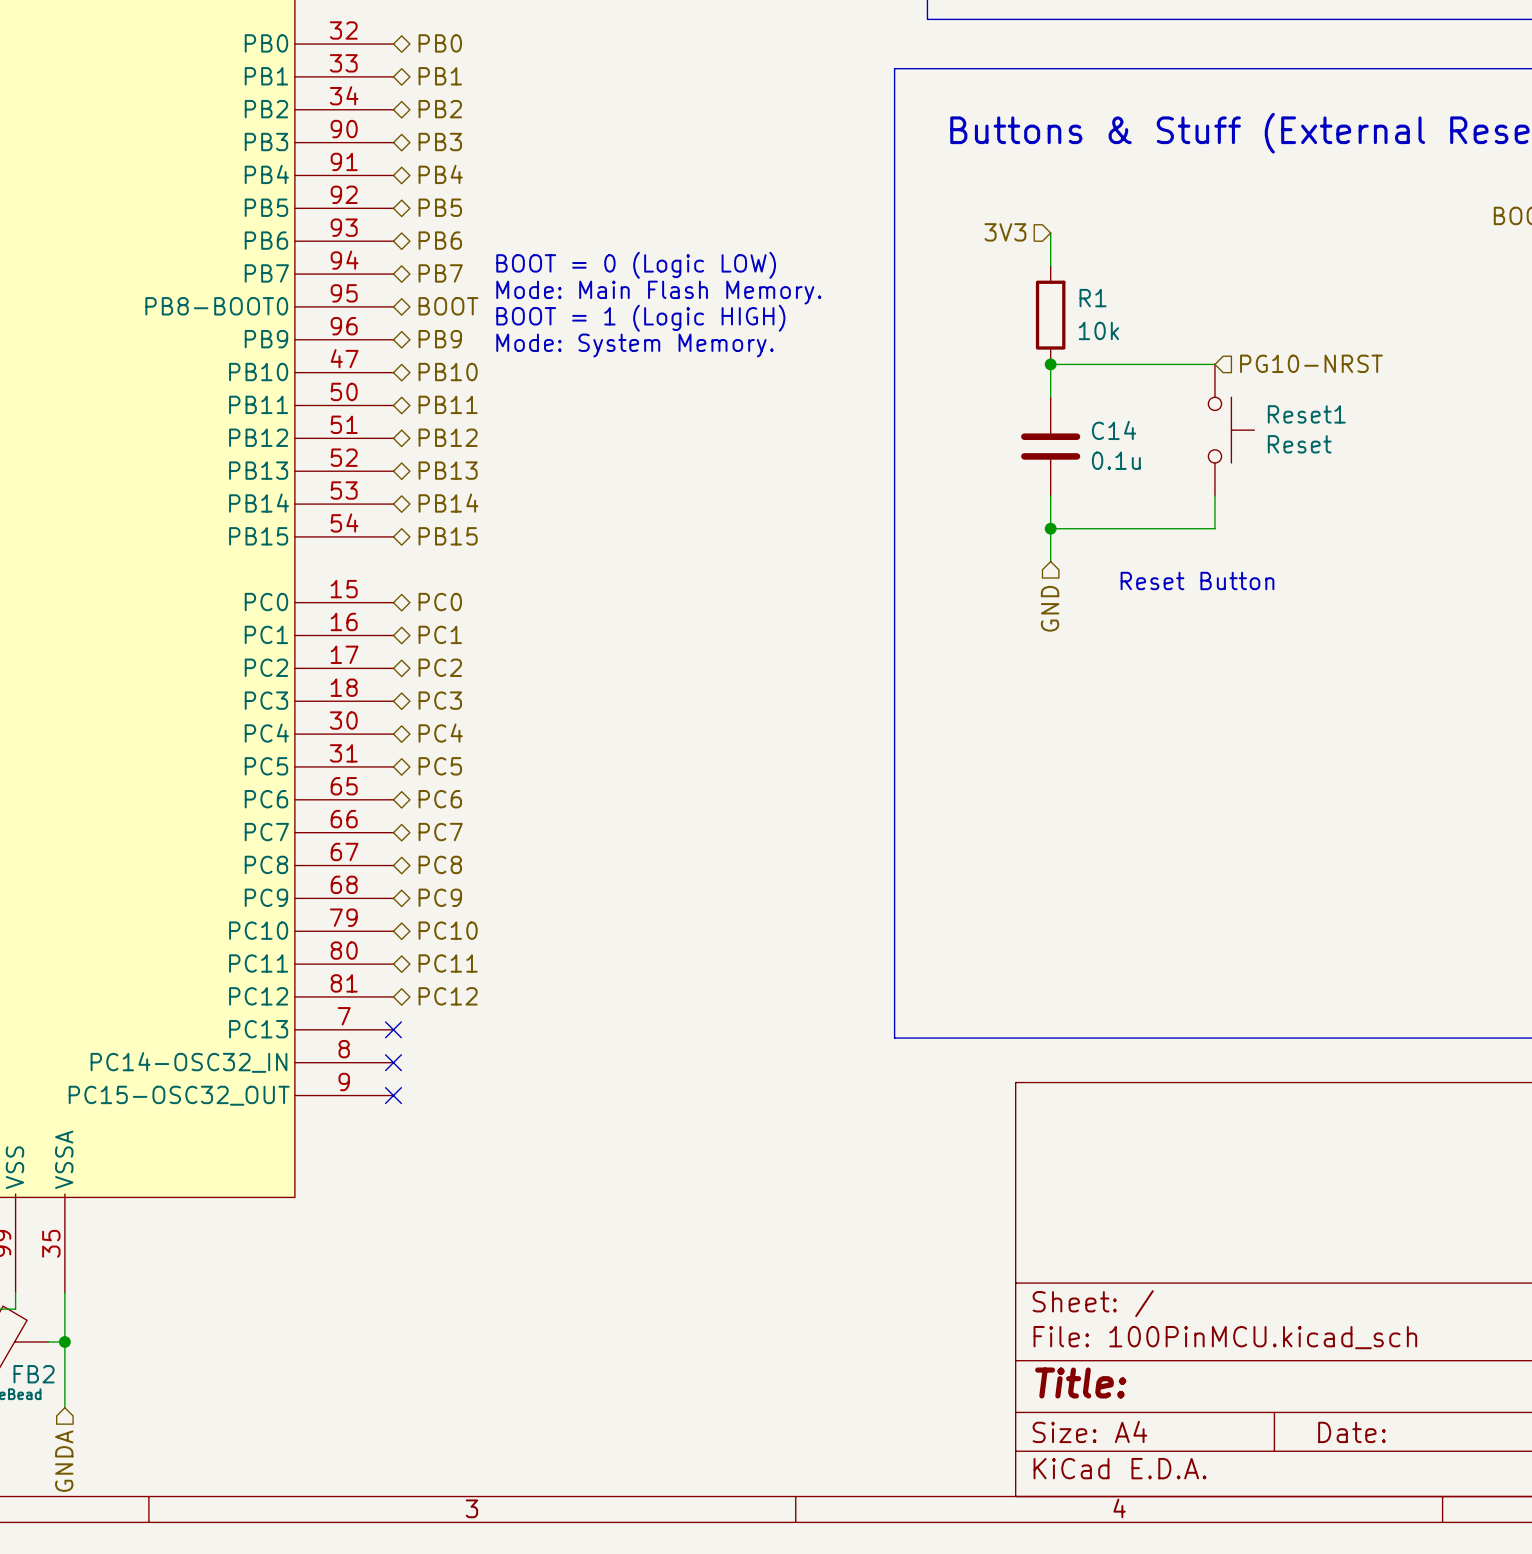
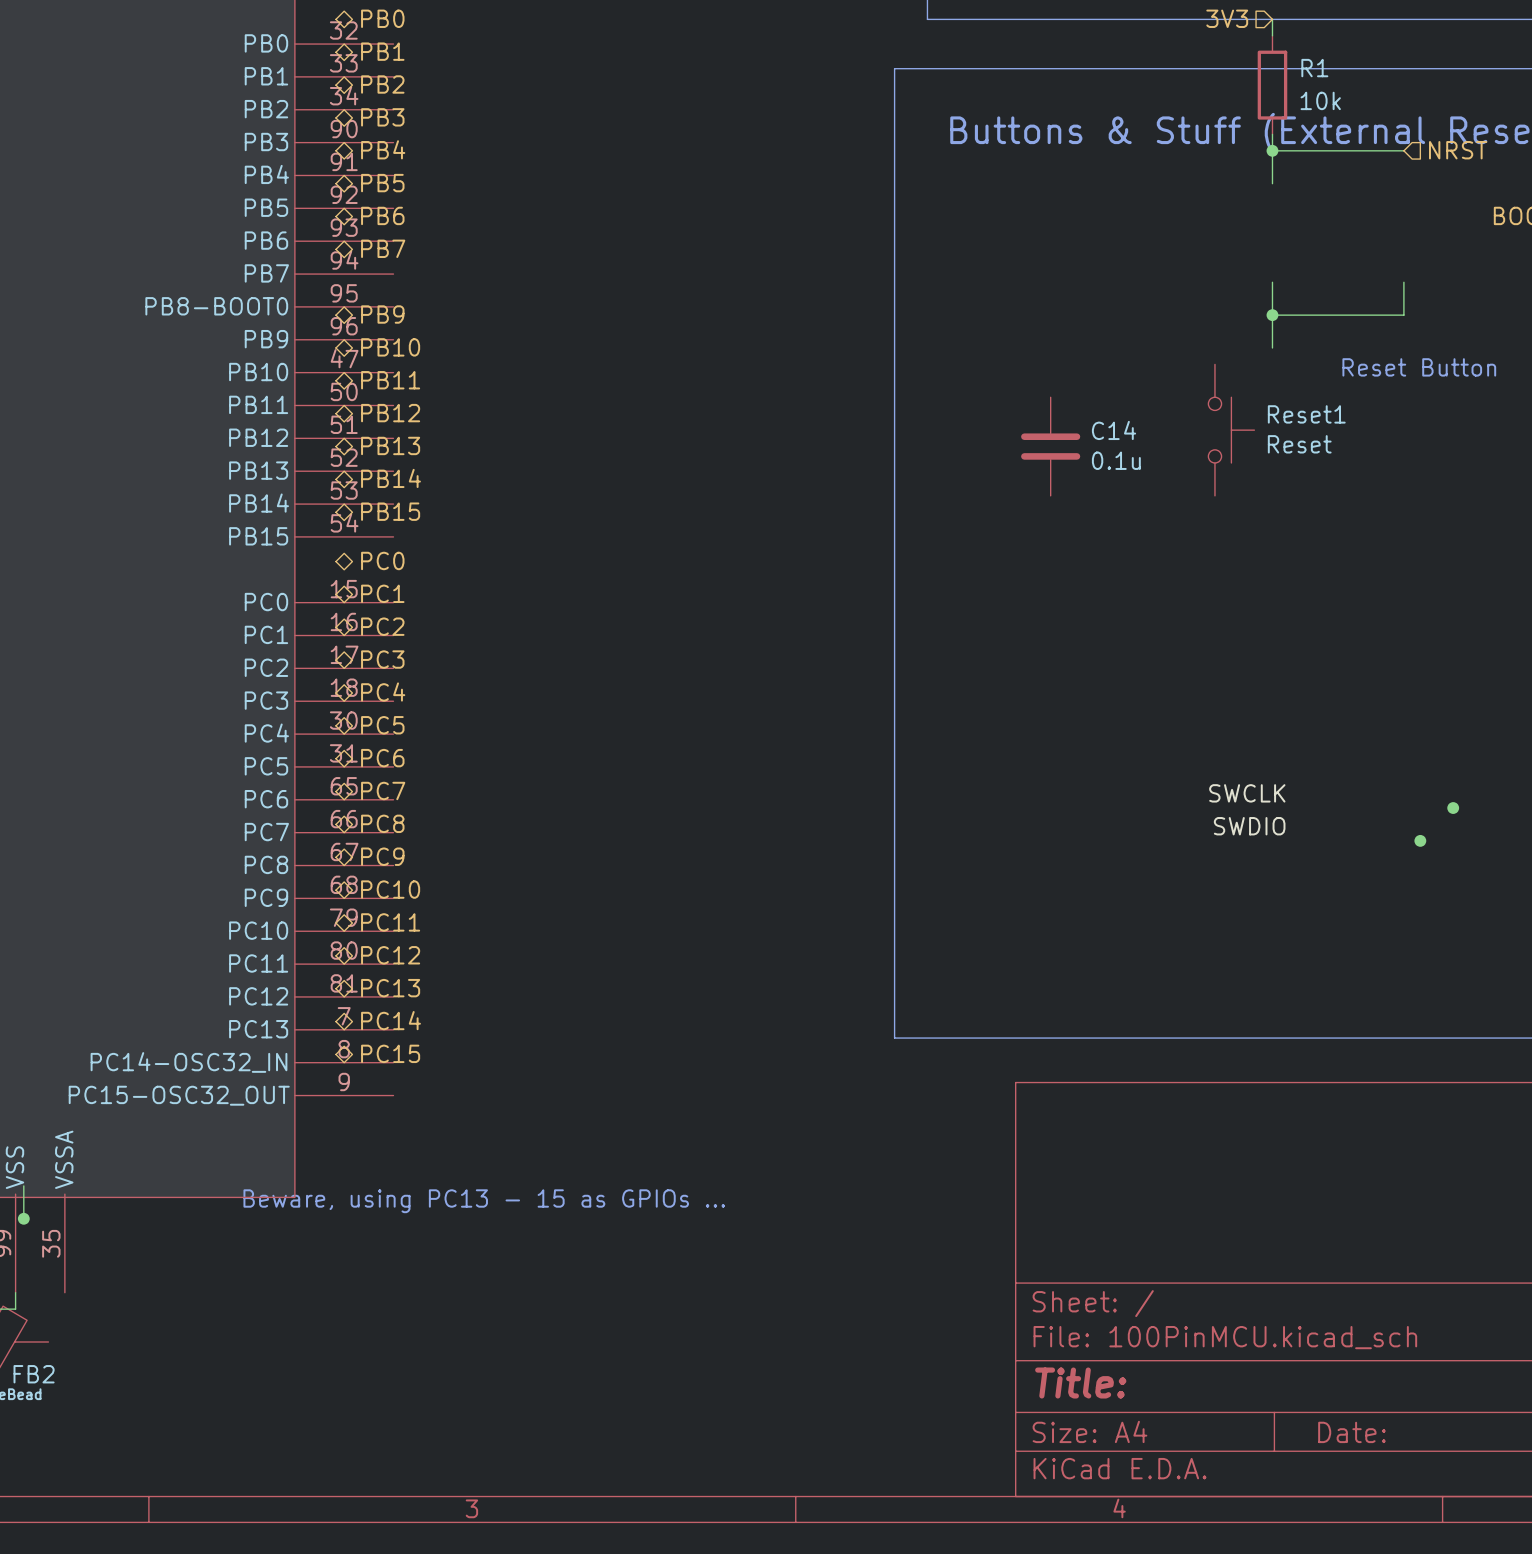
wire: none -> (1272, 19) (1272, 35)
hierarchical label position: PB0 (440, 43) -> PB0 (382, 18)
hierarchical label position: PB1 (440, 76) -> PB1 (382, 51)
hierarchical label position: PB2 (440, 109) -> PB2 (382, 84)
wire: none -> (1272, 134) (1272, 183)
hierarchical label position: PB3 (440, 142) -> PB3 (382, 117)
wire: none -> (1272, 150) (1403, 150)
junction: none -> (1272, 150)
hierarchical label: none -> NRST (1458, 150)
hierarchical label position: PB4 (440, 174) -> PB4 (383, 149)
hierarchical label position: PB5 (440, 207) -> PB5 (382, 183)
hierarchical label position: 3V3 (1005, 232) -> 3V3 (1227, 18)
wire: (1050, 232) (1050, 265) -> none
hierarchical label position: PB6 (440, 240) -> PB6 (382, 215)
text: BOOT = 0 (Logic LOW) (636, 265) -> none
hierarchical label position: PB7 (440, 273) -> PB7 (383, 248)
wire: none -> (1403, 282) (1403, 315) (1272, 315)
text: Mode: Main Flash Memory. (658, 292) -> none
hierarchical label: BOOT (448, 306) -> none
R1 position: (1050, 315) -> (1272, 85)
junction: none -> (1272, 315)
text: BOOT = 1 (Logic HIGH) (640, 318) -> none
hierarchical label position: PB9 (440, 339) -> PB9 (382, 314)
text: Mode: System Memory. (634, 345) -> none
hierarchical label: PG10-NRST (1311, 363) -> none
junction: (1050, 364) -> none
wire: (1214, 364) (1050, 364) (1050, 397) -> none
hierarchical label position: PB10 (448, 372) -> PB10 (390, 347)
hierarchical label position: PB11 (448, 404) -> PB11 (390, 380)
hierarchical label position: PB12 (448, 437) -> PB12 (390, 413)
hierarchical label position: PB13 (448, 470) -> PB13 (390, 445)
wire: (1050, 495) (1050, 561) -> (1272, 282) (1272, 347)
wire: (1214, 495) (1214, 528) (1050, 528) -> none
hierarchical label position: PB14 (448, 503) -> PB14 (390, 478)
junction: (1050, 528) -> none
hierarchical label position: PB15 (448, 536) -> PB15 (390, 511)
text position: Reset Button (1197, 580) -> Reset Button (1419, 367)
hierarchical label position: PC0 (440, 602) -> PC0 (382, 560)
hierarchical label: GND (1050, 608) -> none
hierarchical label position: PC1 (440, 634) -> PC1 (382, 593)
hierarchical label position: PC2 (440, 667) -> PC2 (382, 626)
hierarchical label position: PC3 (440, 700) -> PC3 (382, 659)
hierarchical label position: PC4 (440, 733) -> PC4 (383, 692)
hierarchical label position: PC5 (440, 766) -> PC5 (382, 725)
label: none -> SWCLK (1247, 793)
hierarchical label position: PC6 (440, 799) -> PC6 (382, 758)
junction: none -> (1453, 808)
label: none -> SWDIO (1249, 826)
hierarchical label position: PC7 (440, 832) -> PC7 (383, 790)
junction: none -> (1420, 840)
hierarchical label position: PC8 (440, 864) -> PC8 (382, 823)
hierarchical label position: PC9 (440, 897) -> PC9 (382, 856)
hierarchical label position: PC10 (448, 930) -> PC10 (390, 889)
hierarchical label position: PC11 (448, 963) -> PC11 (390, 922)
hierarchical label: none -> PC13 (390, 988)
hierarchical label position: PC12 (448, 996) -> PC12 (390, 955)
hierarchical label: none -> PC14 (390, 1020)
no-connect mark: (393, 1029) -> none
hierarchical label: none -> PC15 (390, 1053)
no-connect mark: (393, 1062) -> none
no-connect mark: (393, 1095) -> none
wire: none -> (23, 1185) (23, 1218)
text: none -> Beware, using PC13 - 15 as GPIOs ... (484, 1201)
junction: none -> (23, 1218)
wire: (64, 1292) (64, 1407) -> none
wire: (48, 1341) (64, 1341) -> none
junction: (64, 1341) -> none
hierarchical label: GNDA (64, 1461) -> none

